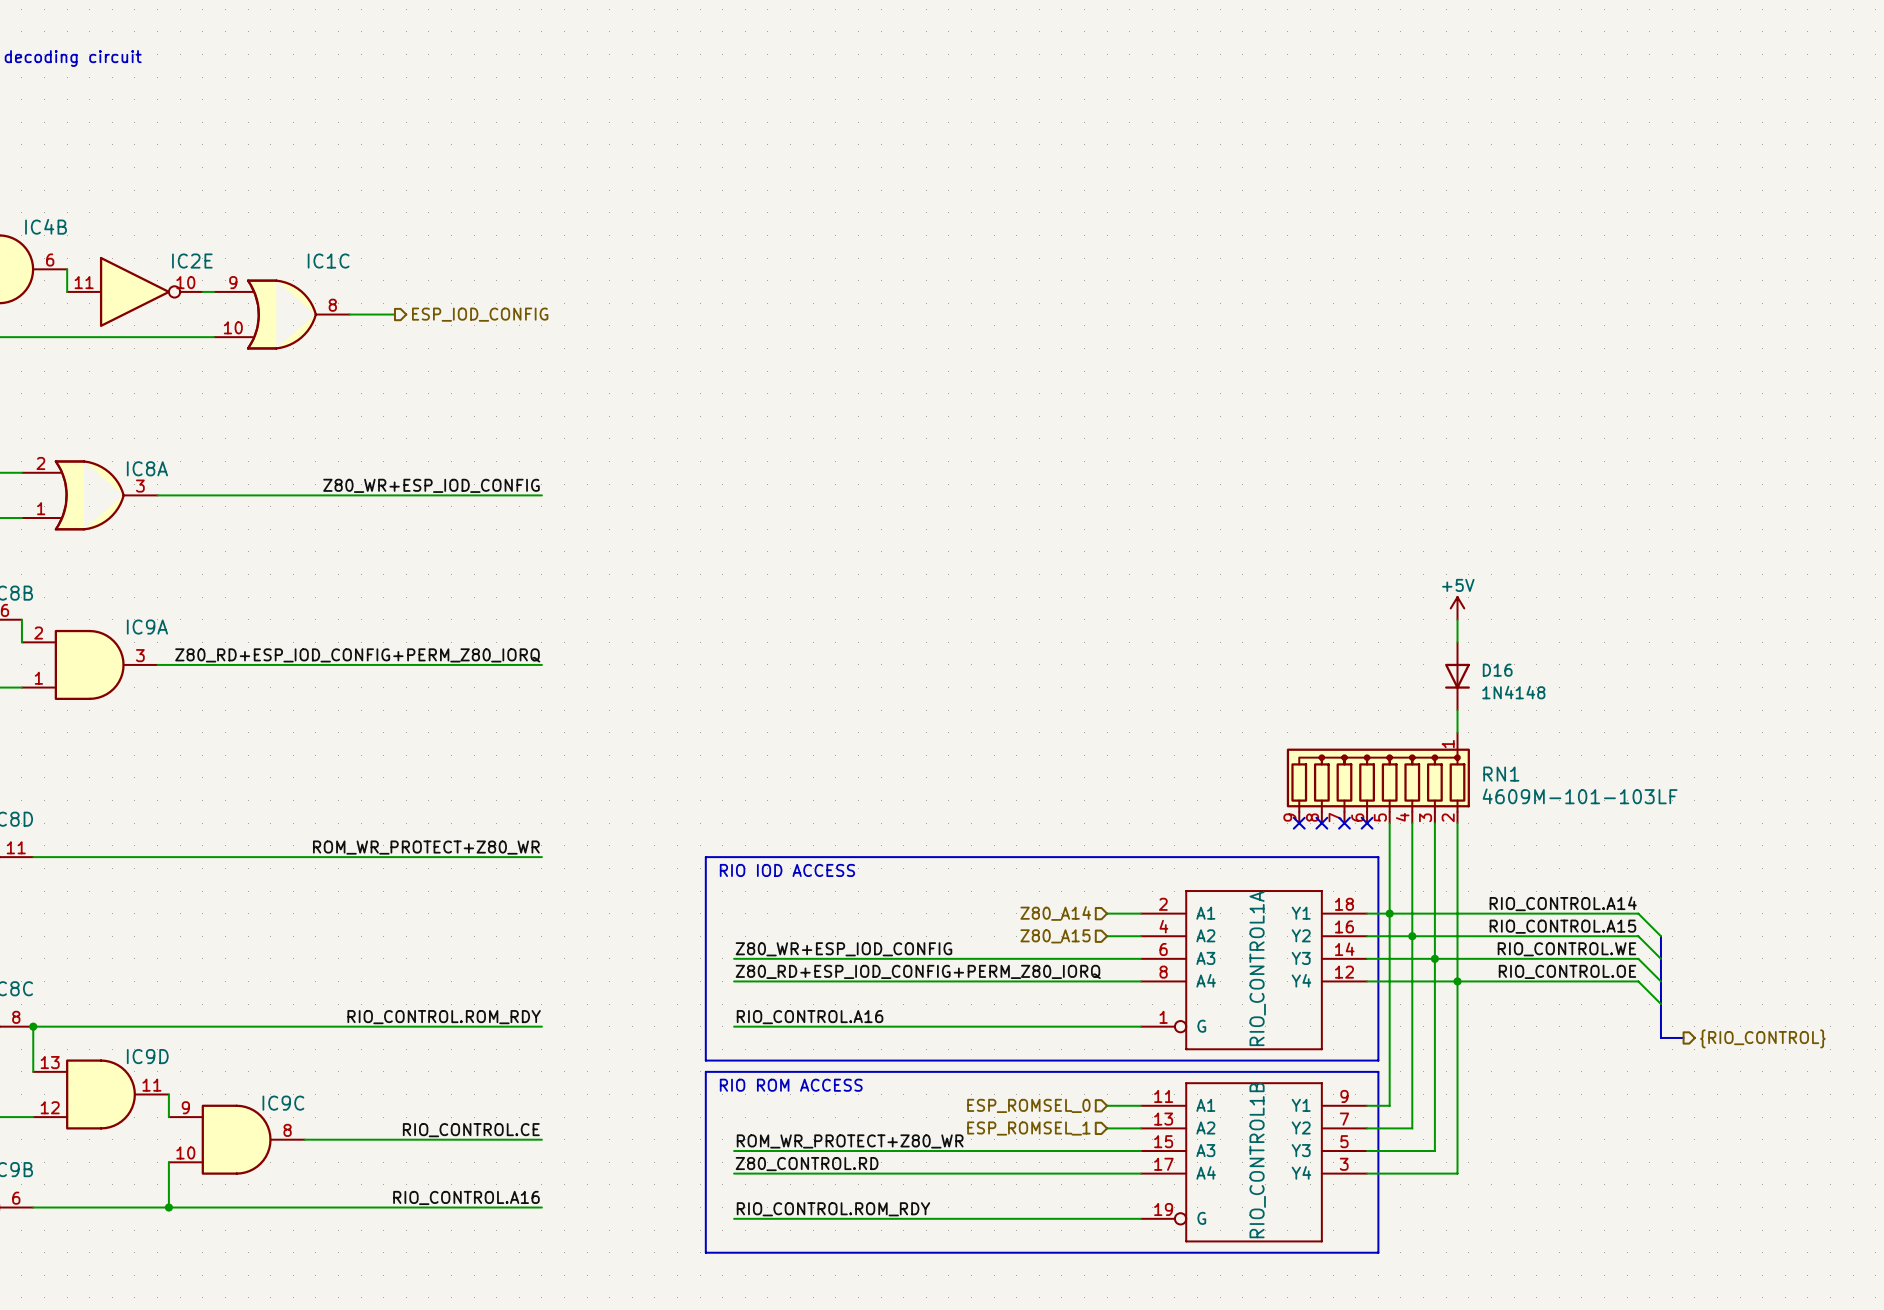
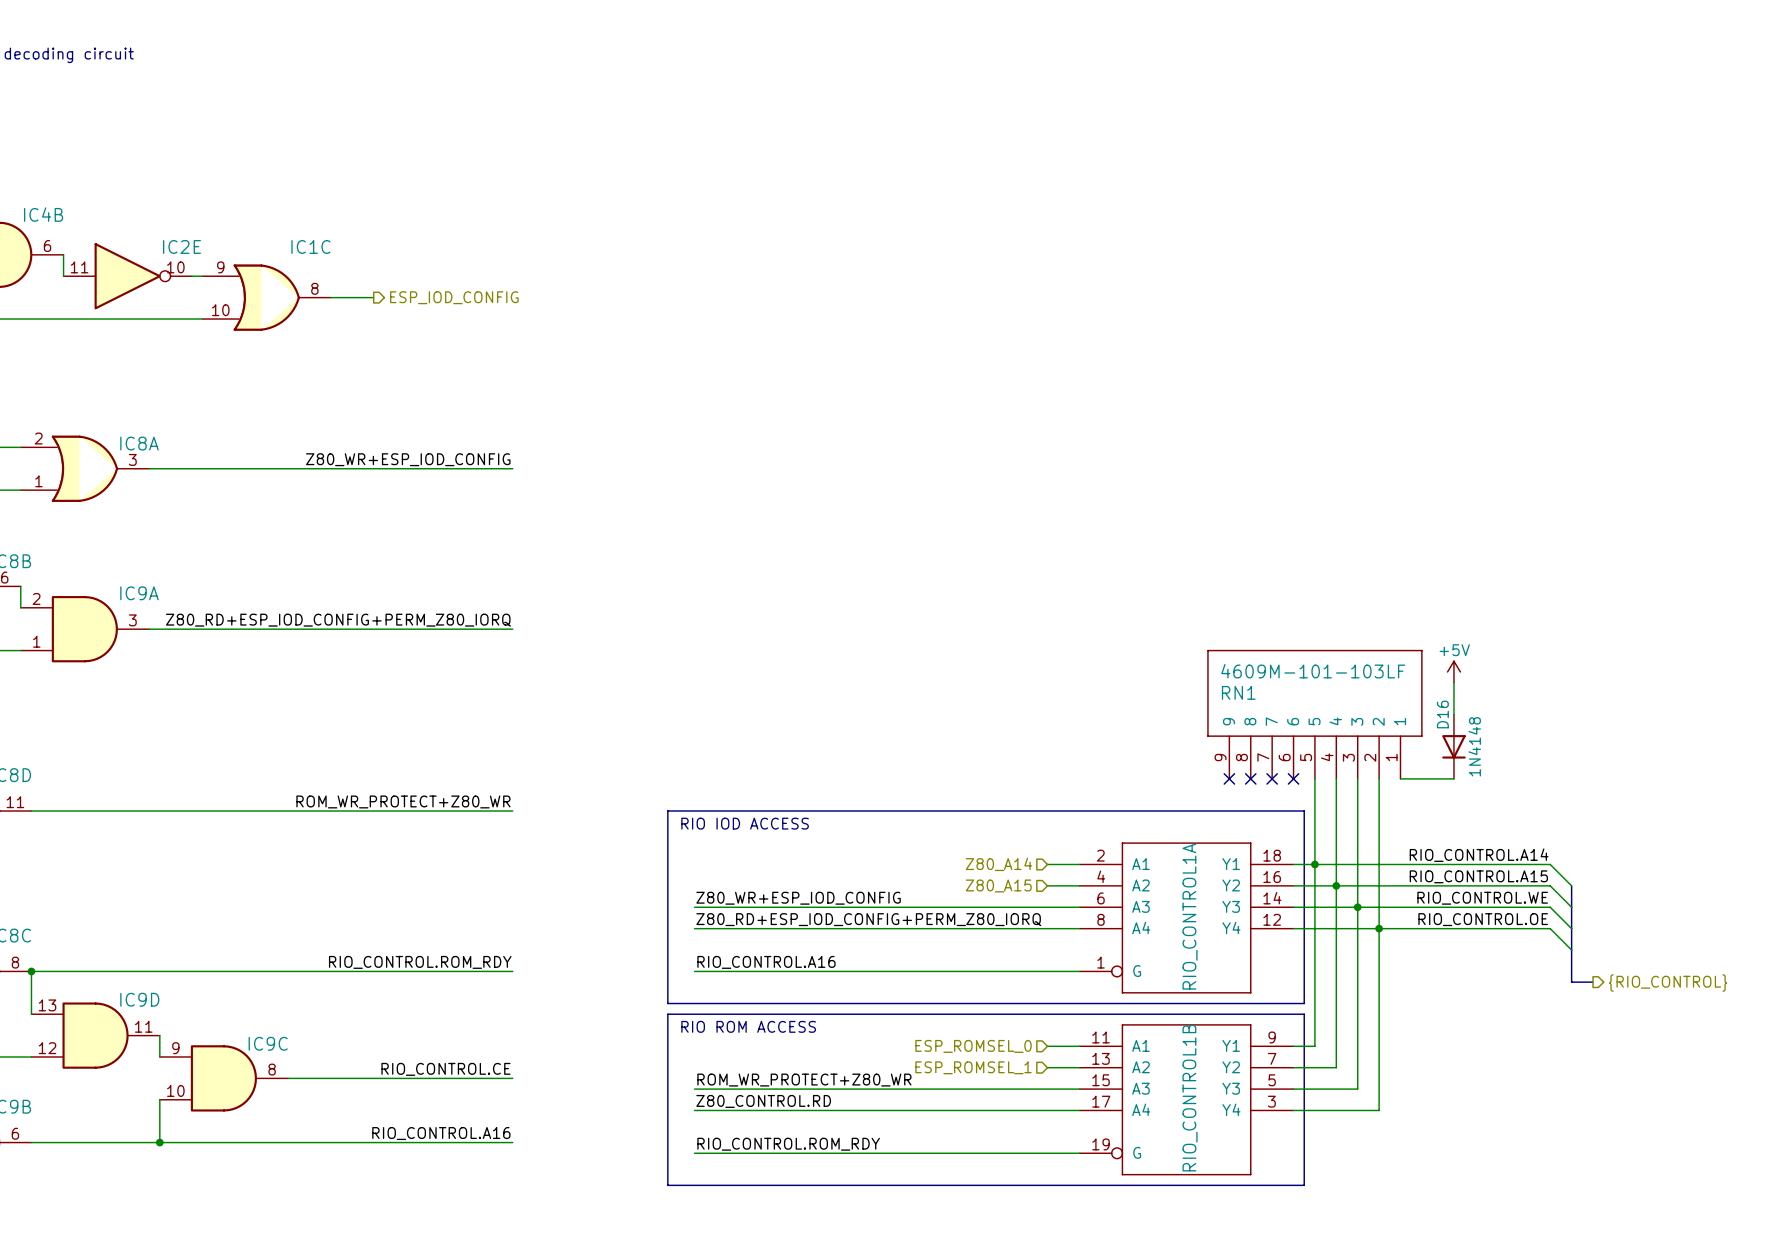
power symbol position: +5V (1457, 608) -> +5V (1453, 671)
wire: (1457, 619) (1457, 642) -> none
D16 name rotation: 0° (1497, 670) -> 90° counterclockwise (1442, 714)
D16 name position: D16 (1497, 670) -> D16 (1442, 714)
D16 position: (1457, 676) -> (1453, 746)
D16 value rotation: 0° (1513, 692) -> 90° counterclockwise (1474, 746)
wire: (1457, 710) (1457, 732) -> none
wire: none -> (1453, 682) (1453, 714)
RN1 symbol: [1286, 732, 1470, 824] -> [1207, 650, 1422, 779]
RN1 name position: RN1 (1501, 774) -> RN1 (1238, 692)
RN1 value position: 4609M-101-103LF (1580, 796) -> 4609M-101-103LF (1313, 671)
wire: none -> (1400, 778) (1453, 778)

